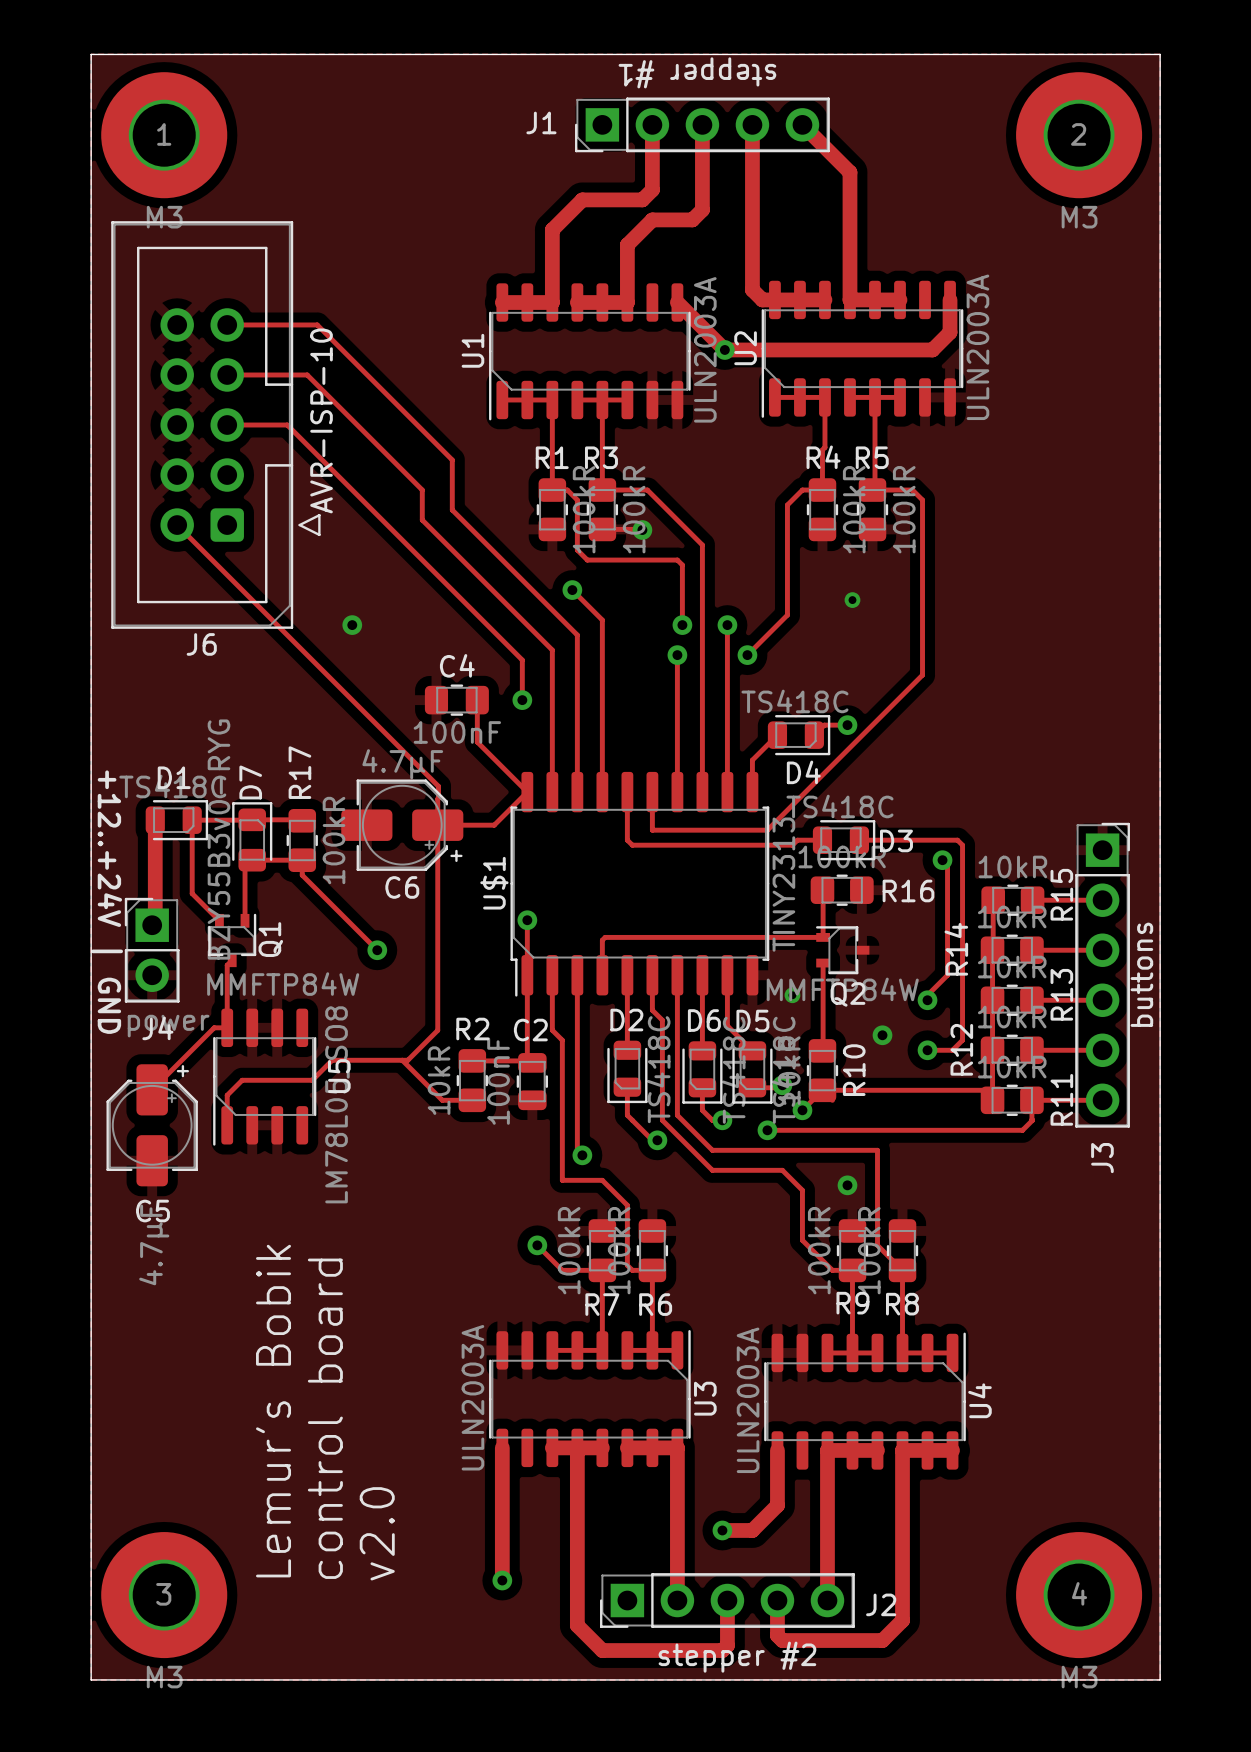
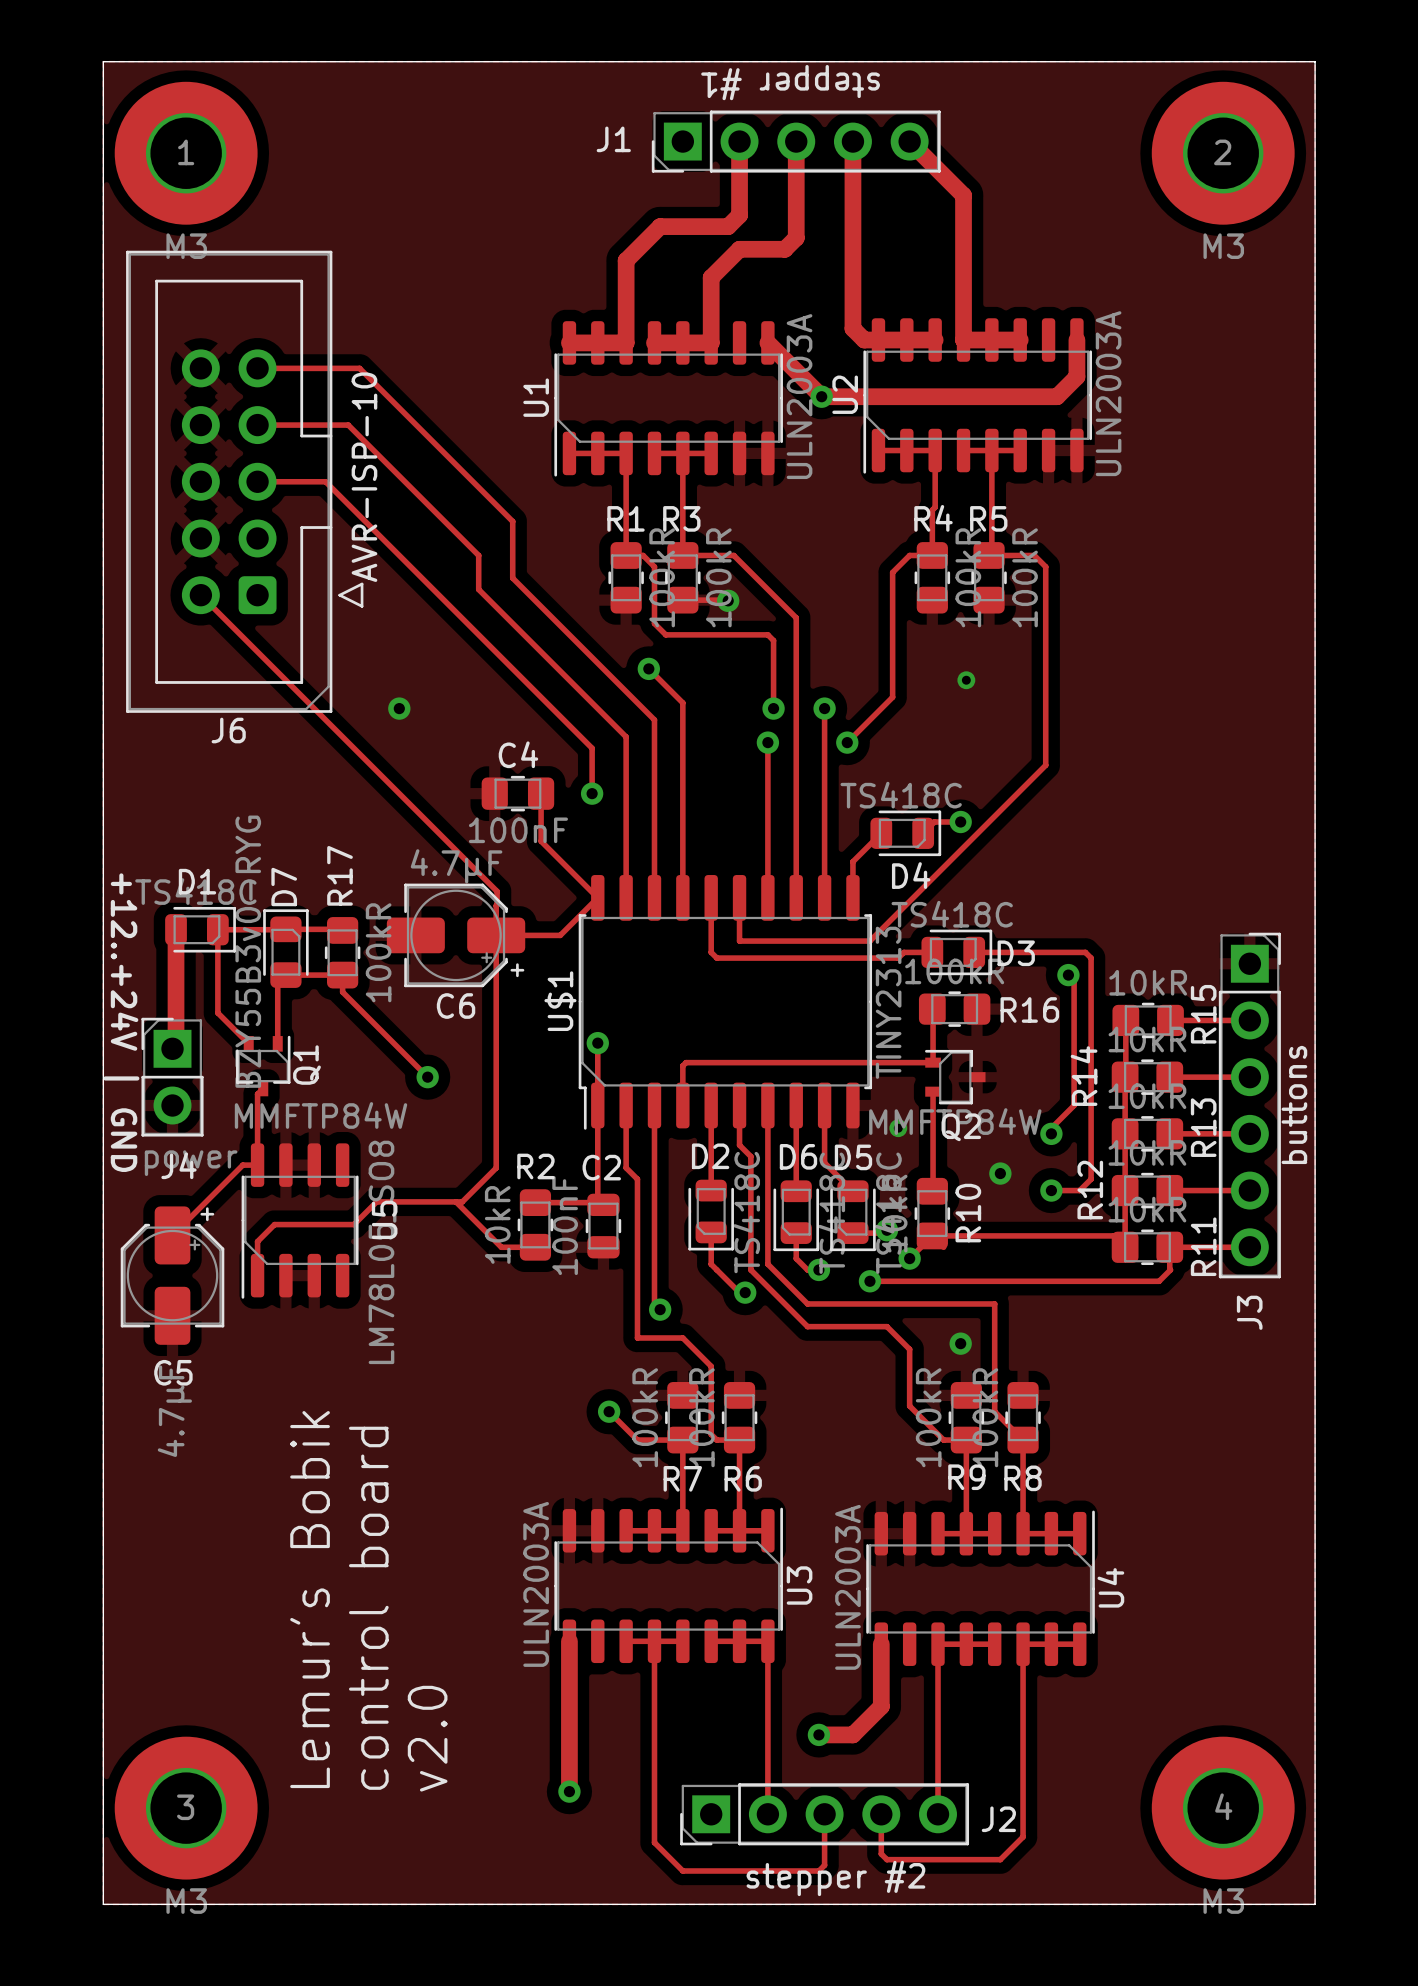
track width: thick (552, 1447) (602, 1447) -> thin (626, 1641) (682, 1641)
track width: thick (577, 1447) (577, 1625) (602, 1650) (722, 1650) (727, 1645) (727, 1600) -> thin (654, 1641) (654, 1842) (682, 1871) (818, 1871) (824, 1865) (824, 1814)
track width: thick (627, 1447) (677, 1447) (677, 1600) -> thin (711, 1641) (767, 1641) (767, 1814)
track width: thick (877, 1450) (827, 1450) (827, 1600) -> thin (994, 1644) (938, 1644) (938, 1814)
track width: thick (952, 1450) (902, 1450) (902, 1620) (882, 1640) (782, 1640) (777, 1635) (777, 1600) -> thin (1079, 1644) (1023, 1644) (1023, 1836) (1000, 1859) (886, 1859) (881, 1853) (881, 1814)

